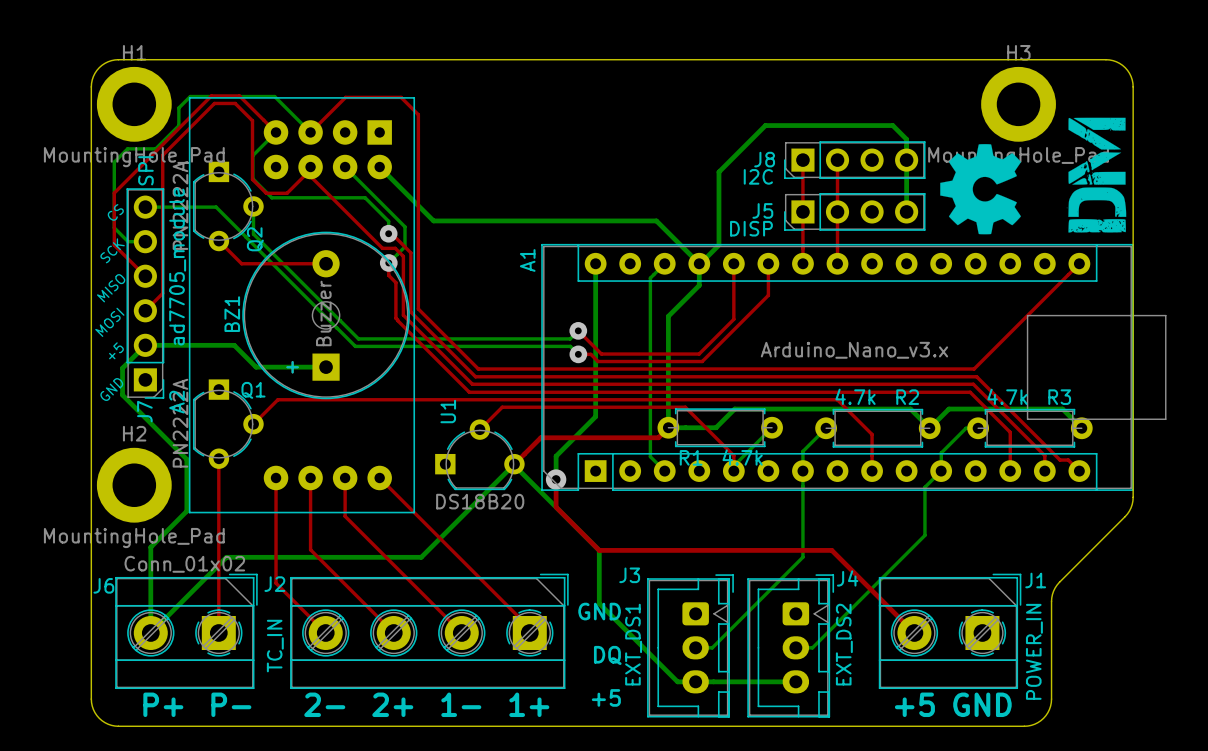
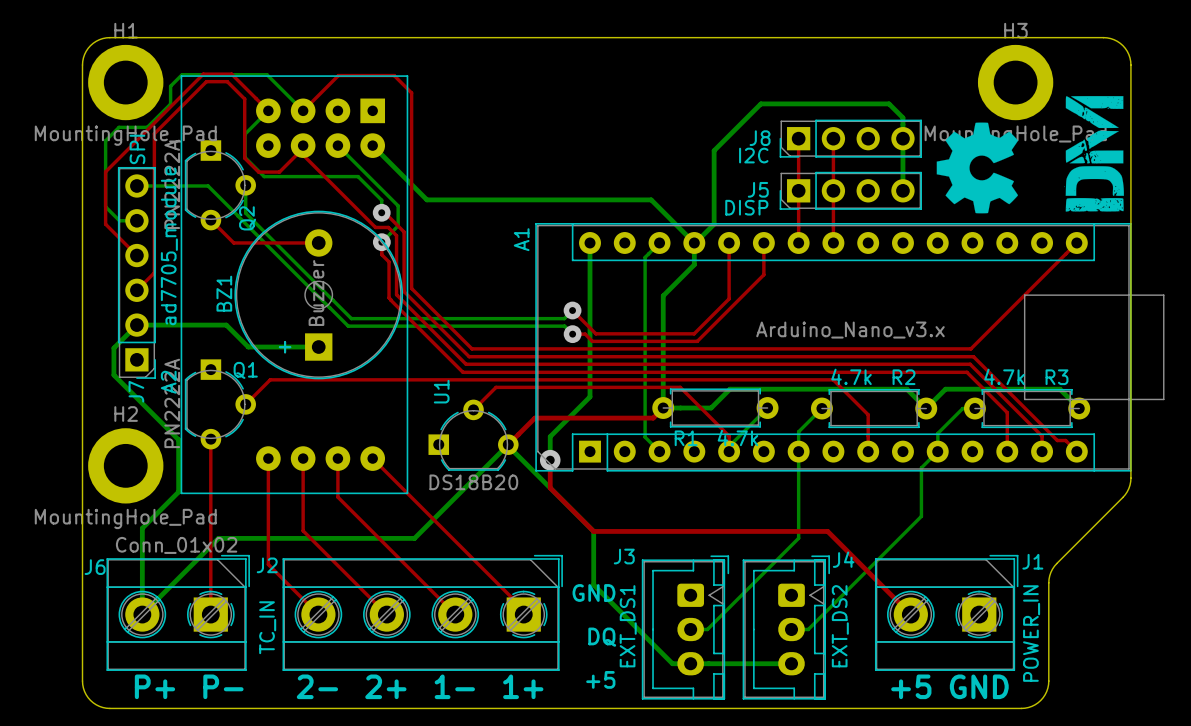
text: CS (115, 212) -> none
text: SCK (112, 250) -> none
text: MISO (111, 288) -> none
text: MOSI (109, 322) -> none
text: +5 (116, 350) -> none
text: GND (111, 389) -> none

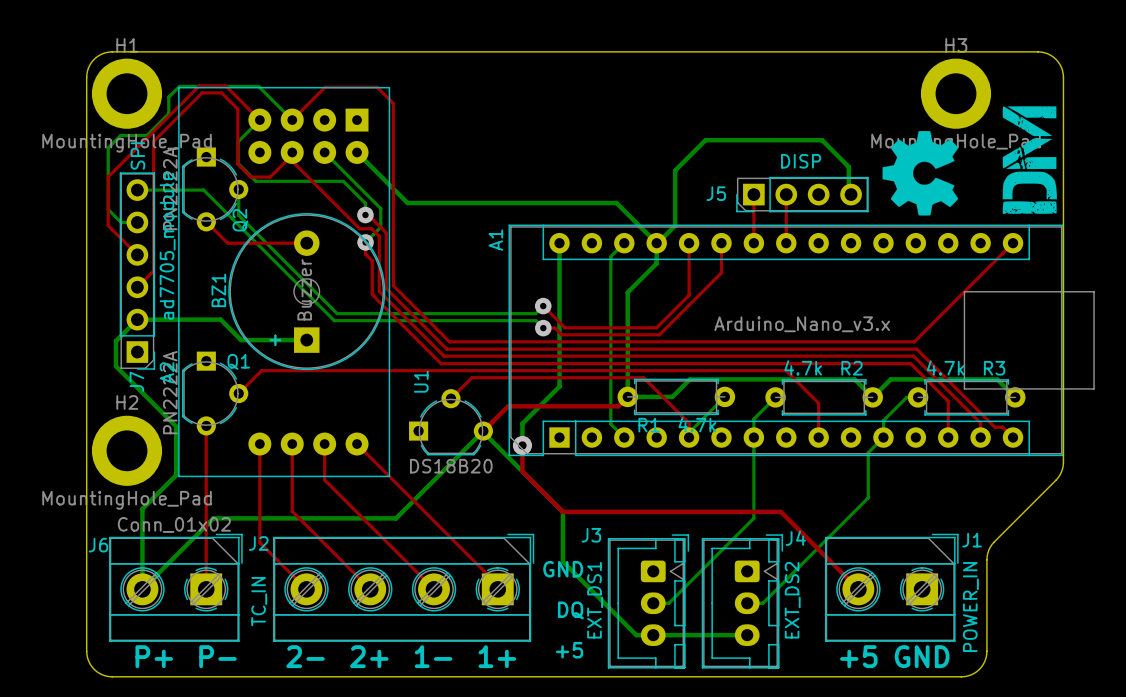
top track: (798, 138) (798, 190) -> none
top track: (833, 138) (833, 190) -> none
J8: I2C (850, 138) -> none
bottom track: (714, 165) (714, 150) (760, 103) (889, 103) (902, 117) (902, 190) -> (675, 170) (705, 140) (822, 140) (848, 166) (848, 192) (851, 194)
J5 value position: DISP (746, 207) -> DISP (801, 161)

